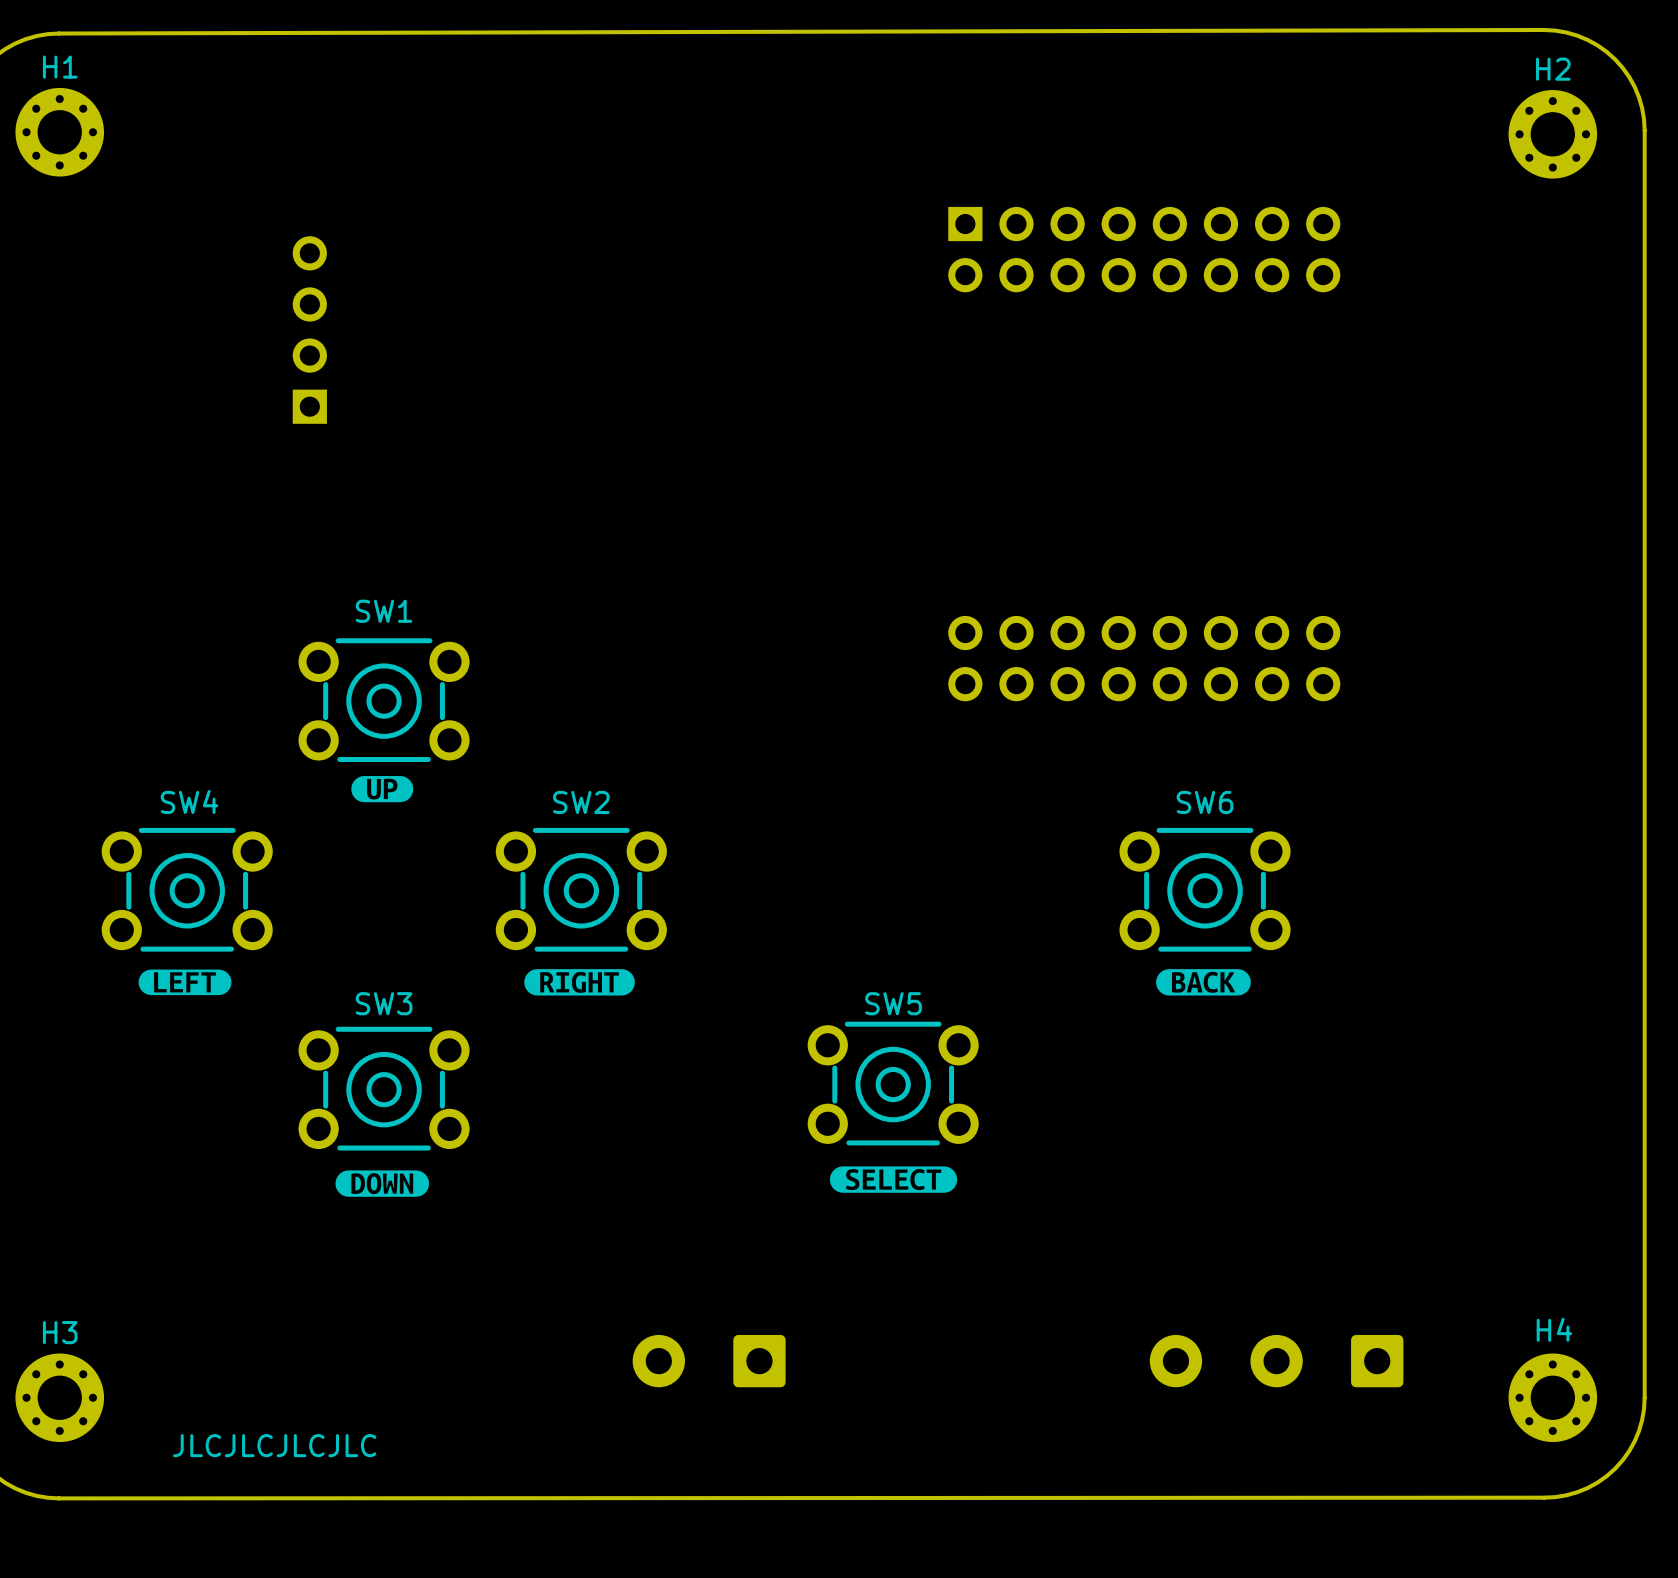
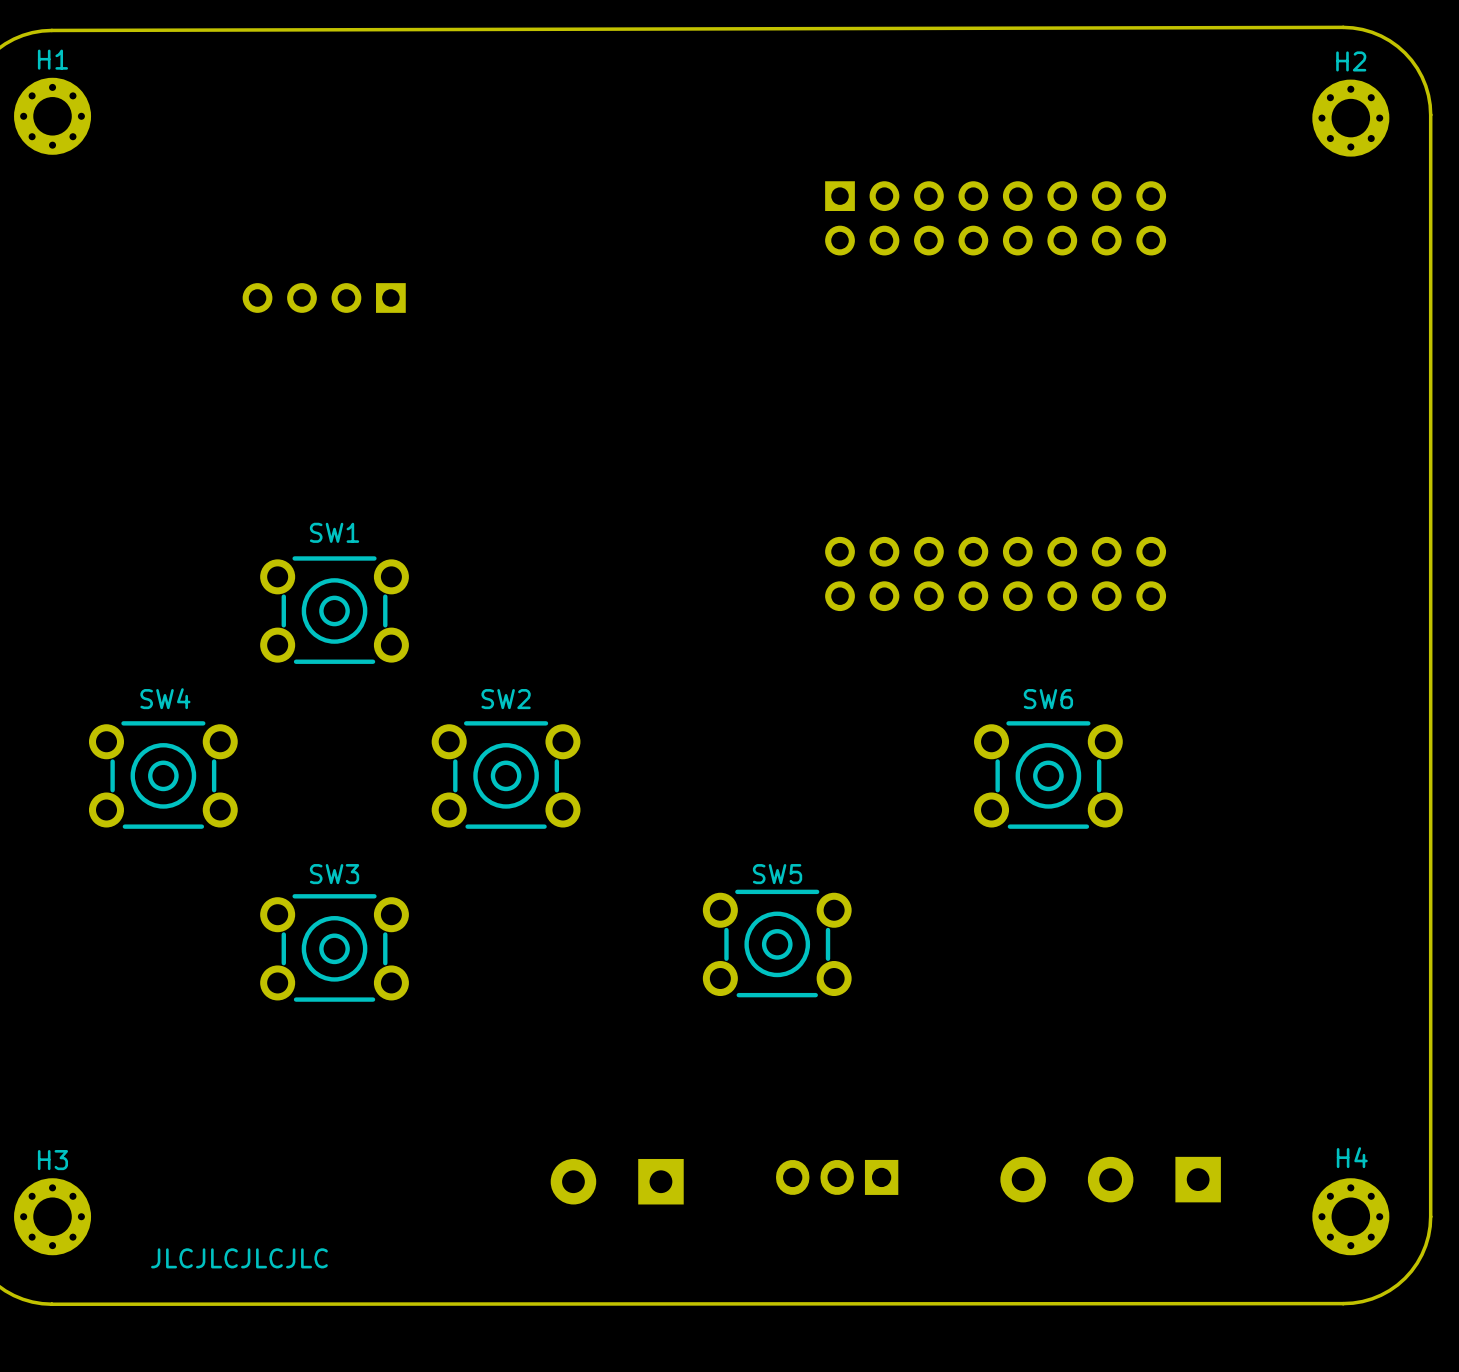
part rotation: 0° (309, 330) -> 90° counterclockwise (324, 297)
drawing: [351, 776, 414, 803] -> none
drawing: [138, 969, 232, 996] -> none
drawing: [524, 969, 635, 996] -> none
drawing: [1156, 969, 1251, 996] -> none
drawing: [829, 1166, 958, 1193] -> none
drawing: [335, 1170, 430, 1197] -> none
part footprint: [632, 1334, 786, 1388] -> [550, 1158, 684, 1205]
part footprint: [1149, 1334, 1404, 1388] -> [1000, 1156, 1221, 1203]
part: none -> (837, 1177)

